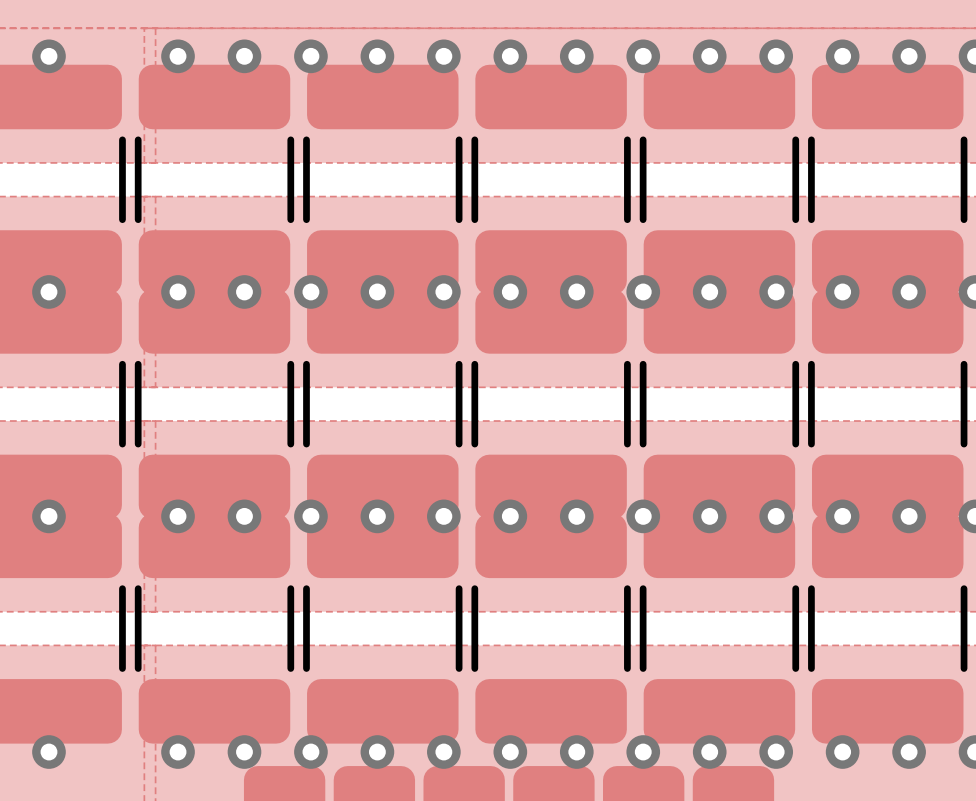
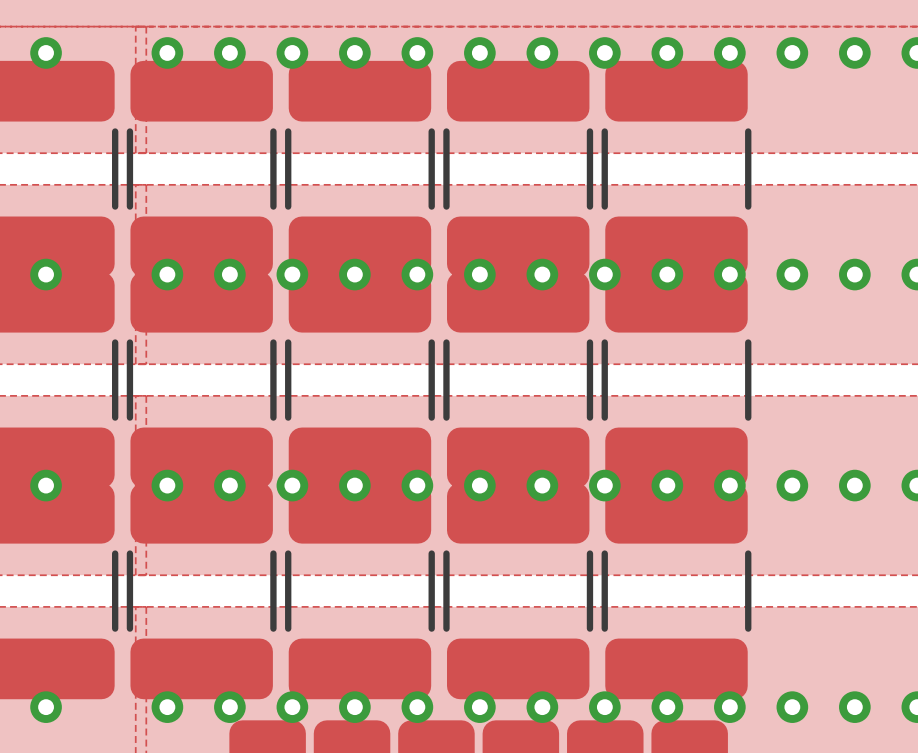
part: (887, 179) -> none
part: (887, 404) -> none
part: (887, 628) -> none

